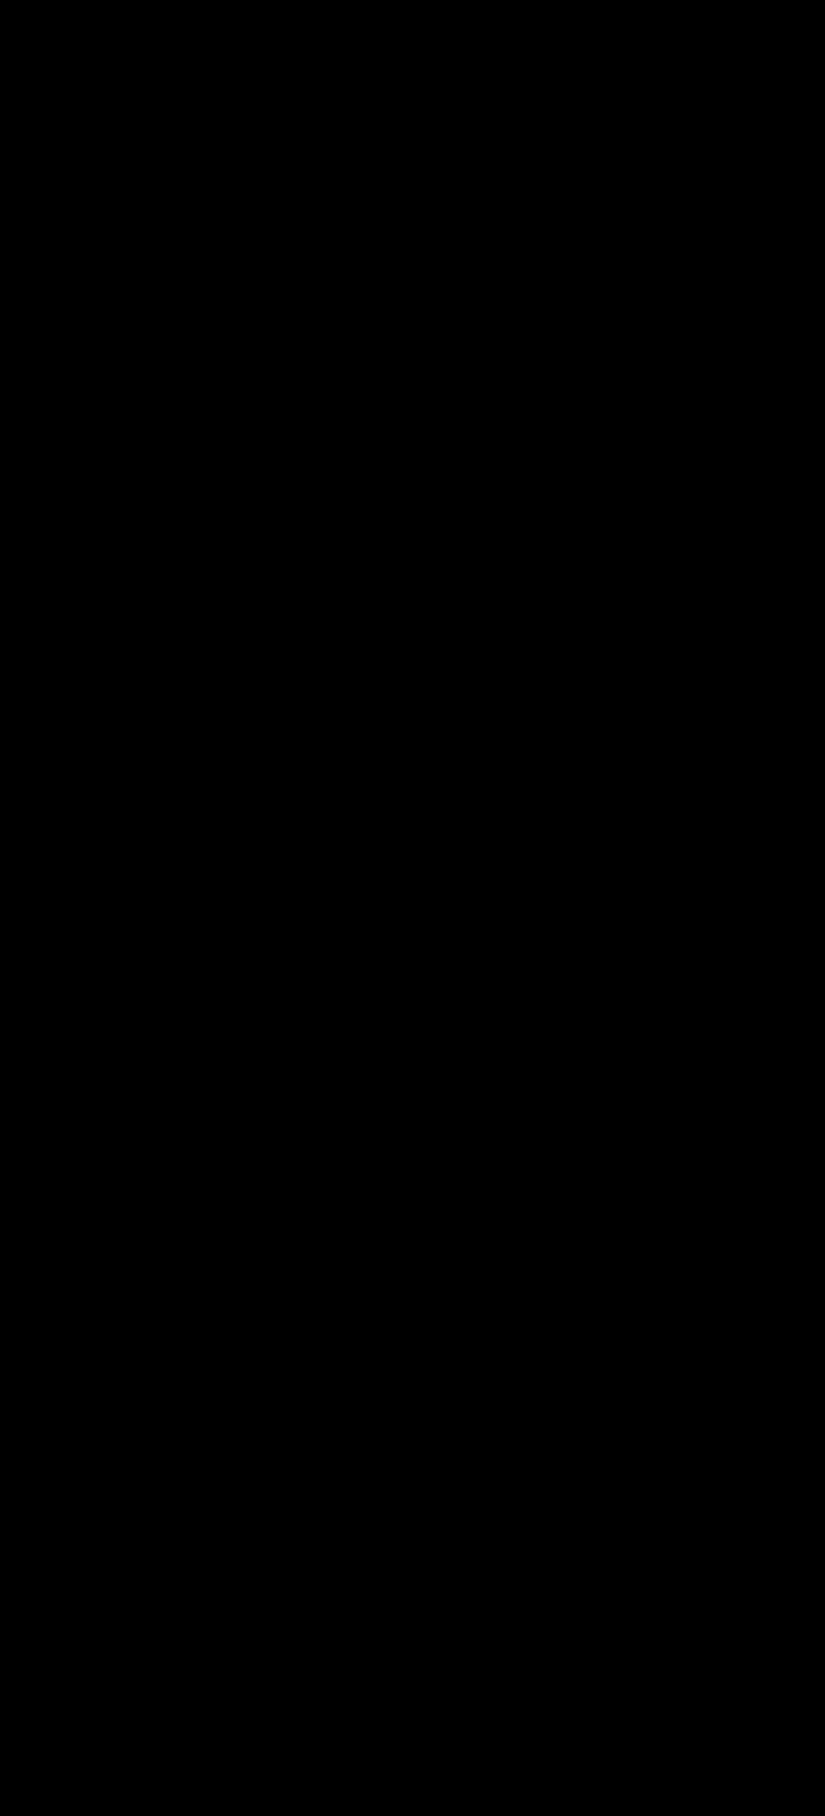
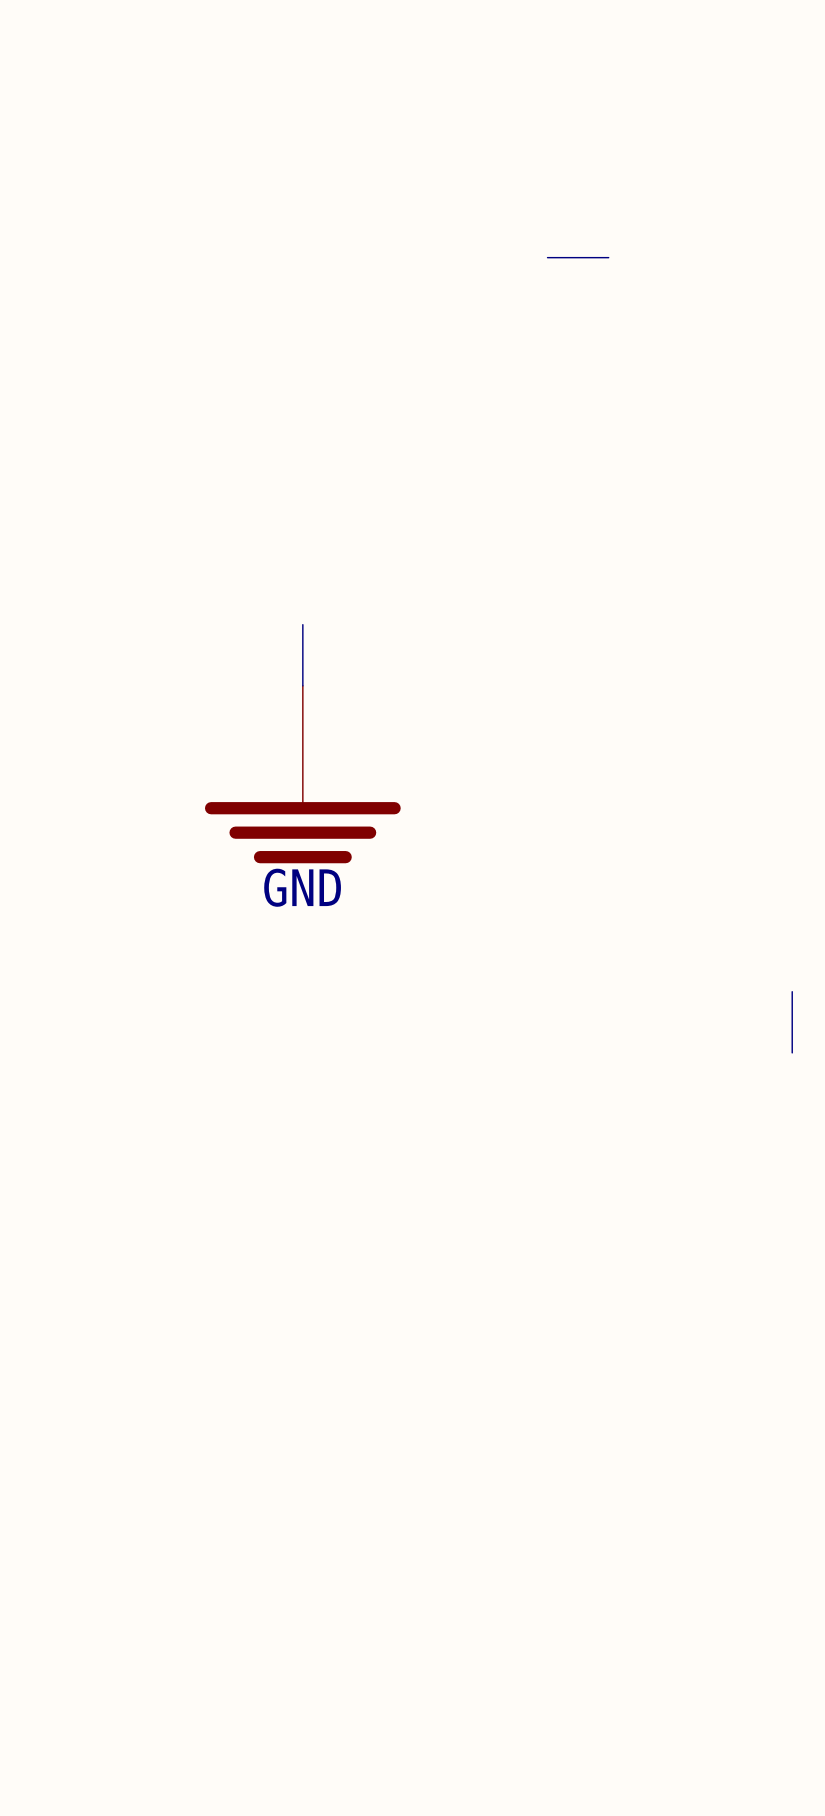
wire: none -> (547, 257) (608, 257)
wire: none -> (302, 624) (302, 685)
power symbol: none -> GND (302, 774)
wire: none -> (792, 991) (792, 1052)

